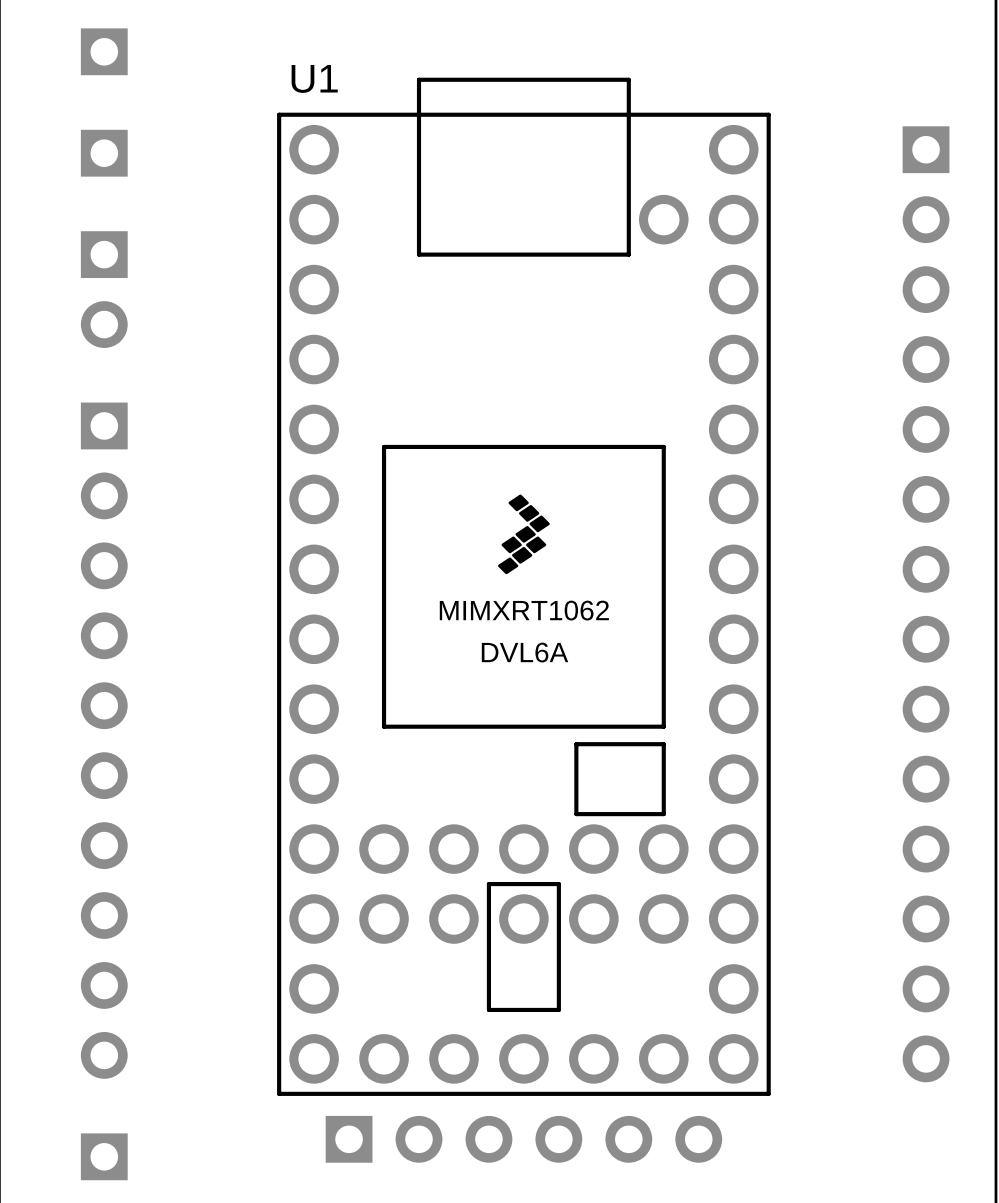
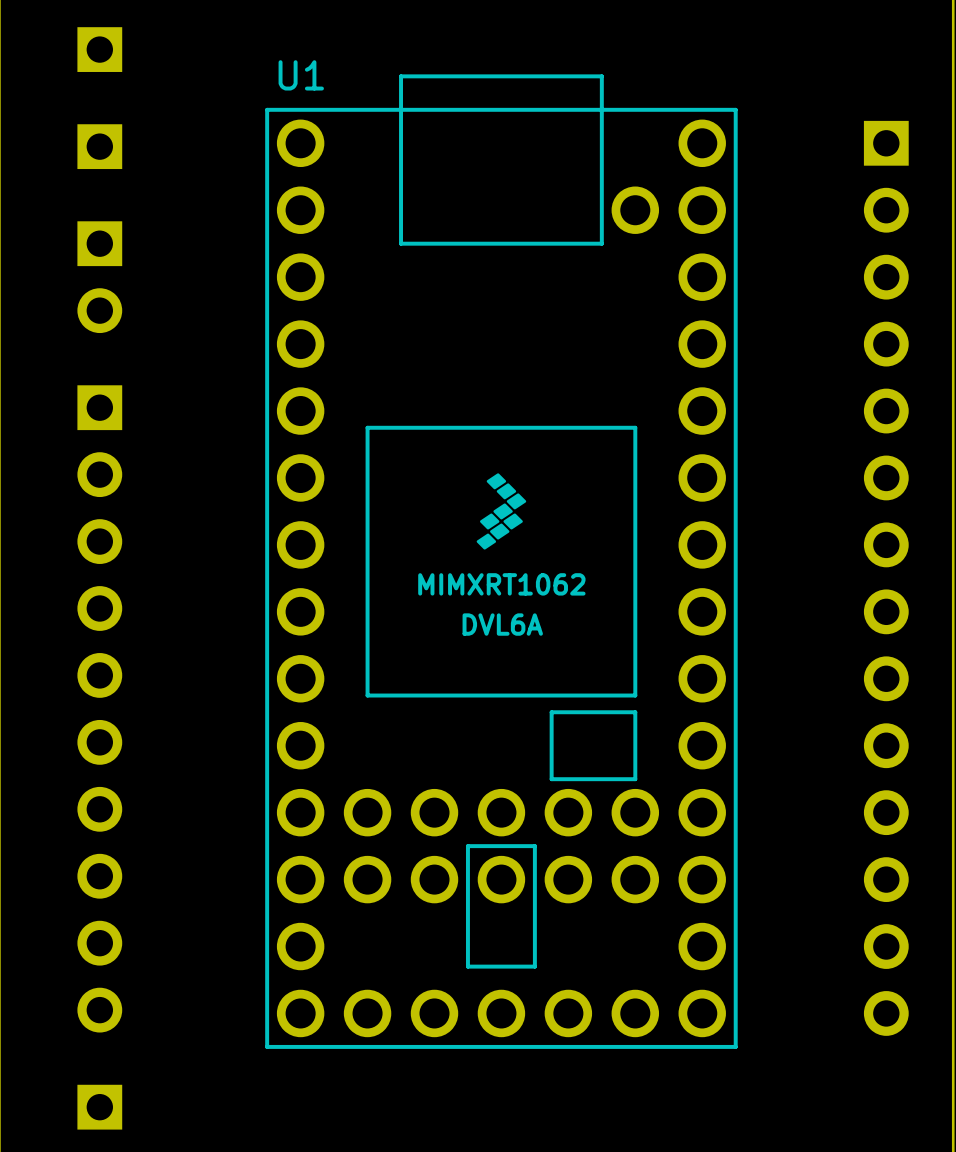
part: (523, 1139) -> none

